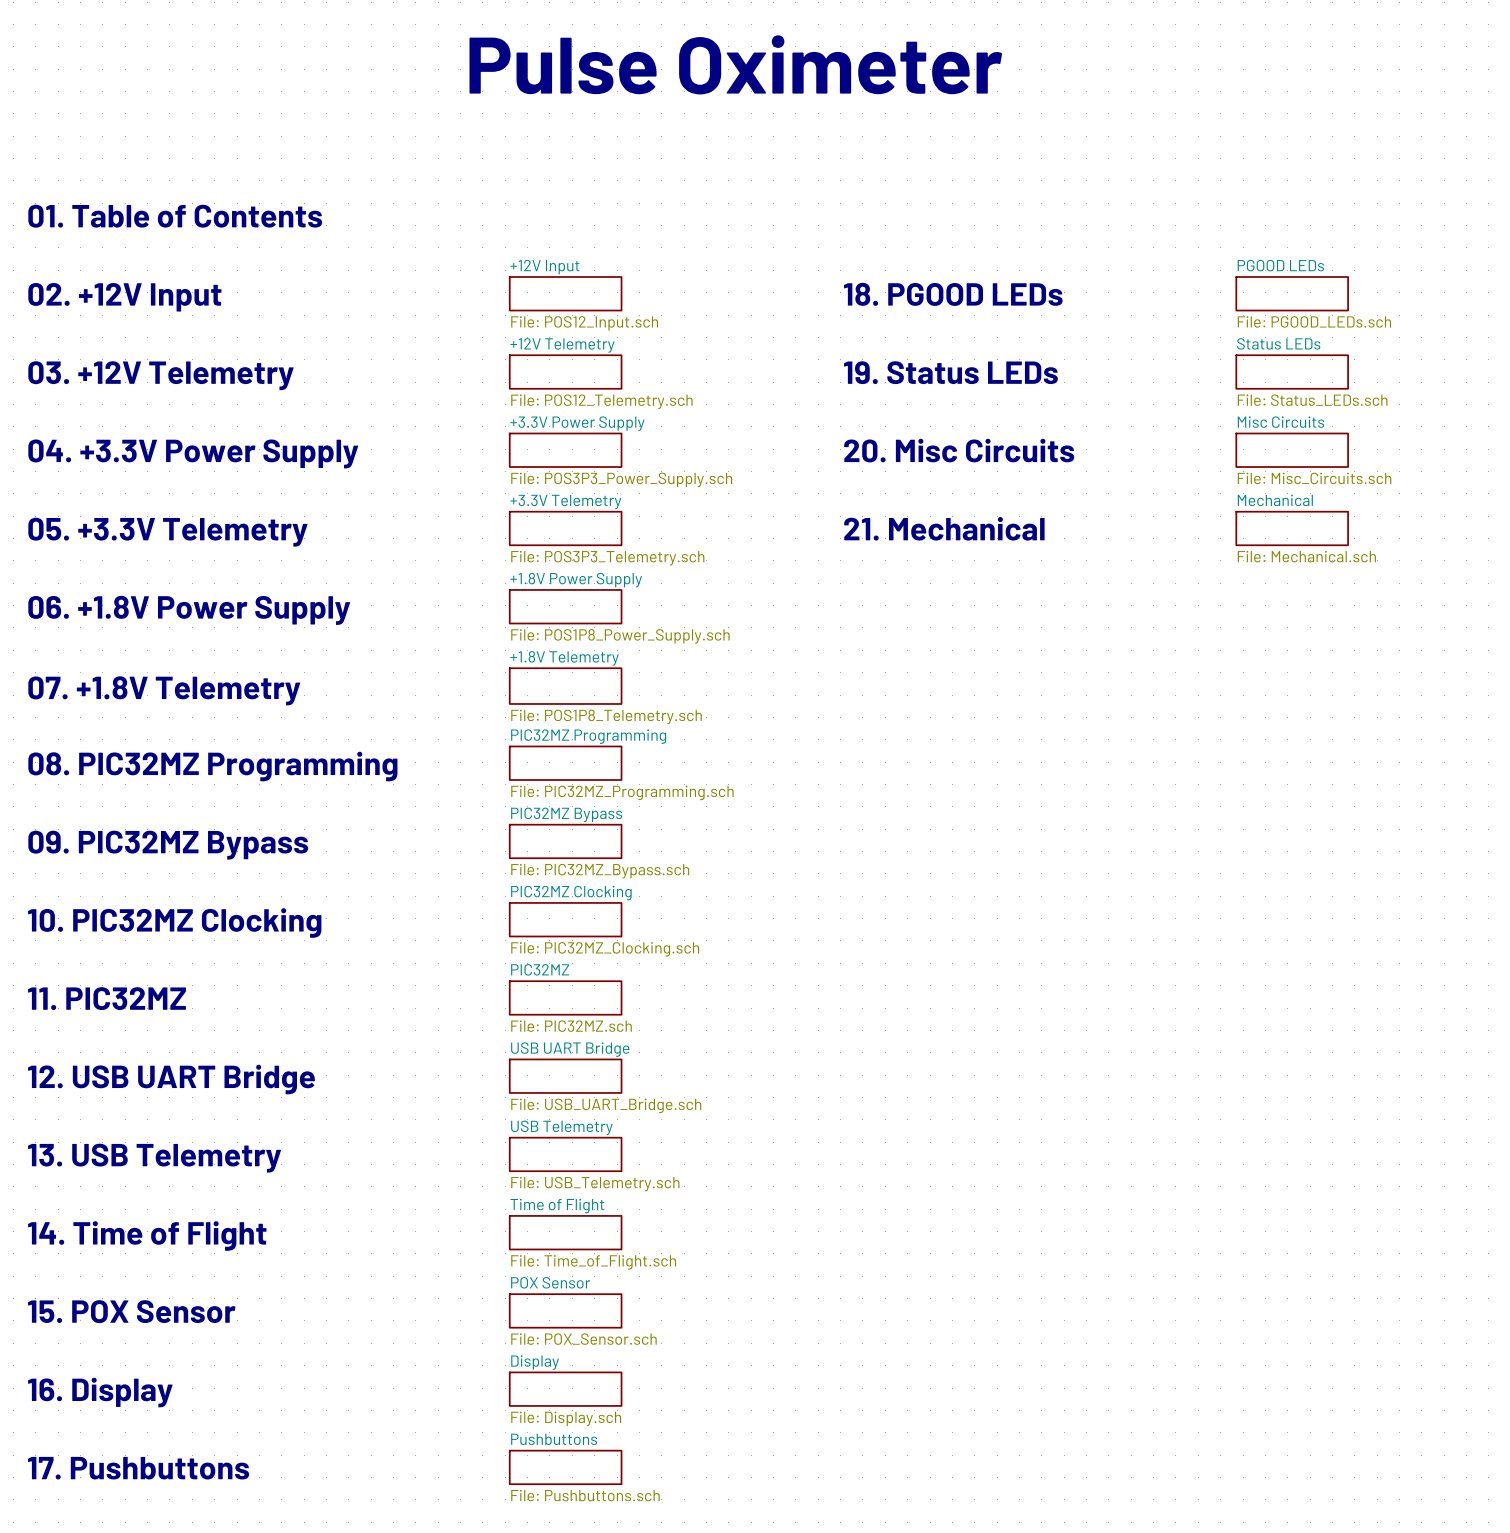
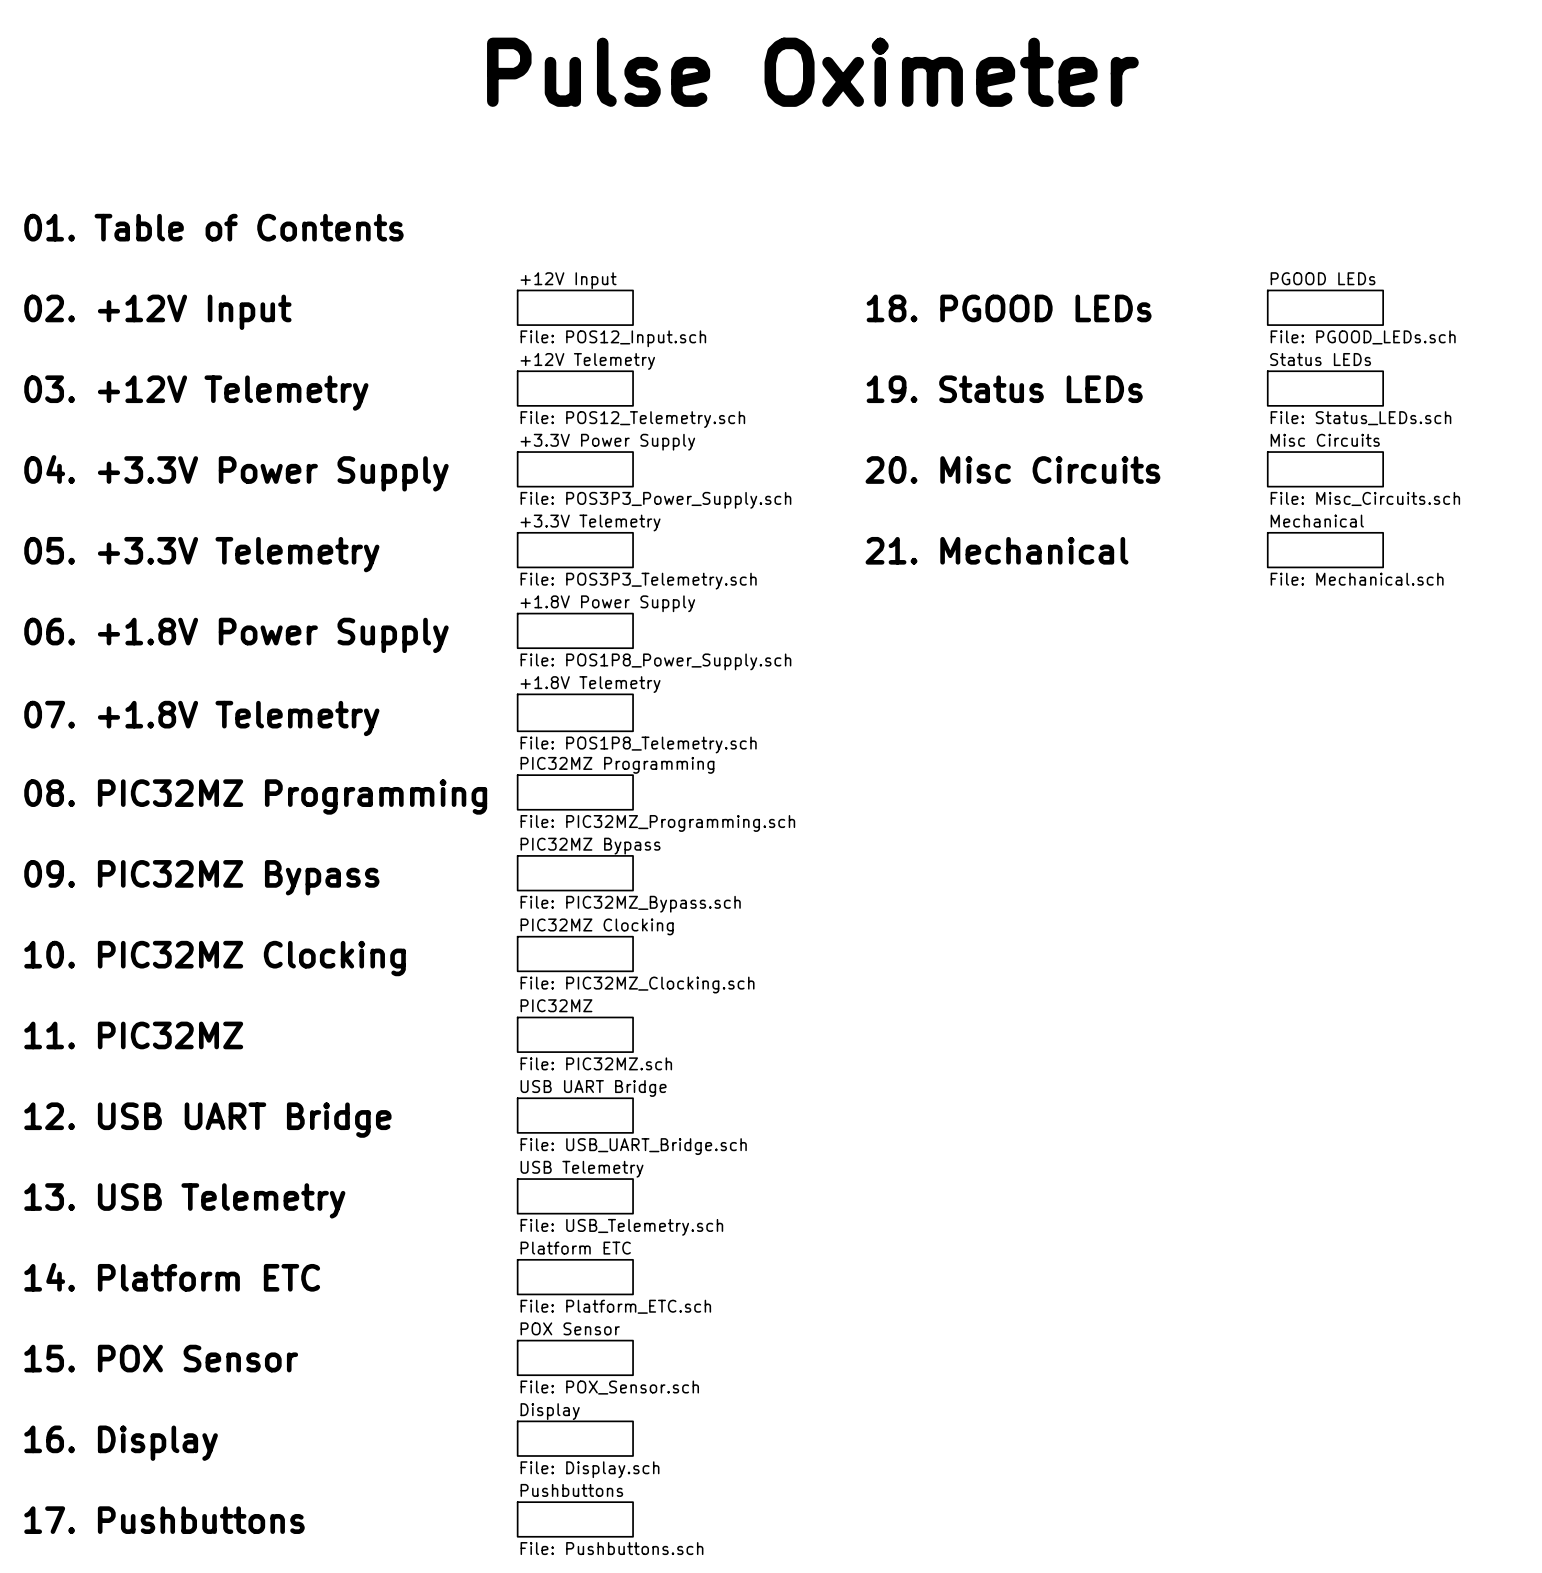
sheet Time of Flight name: Time of Flight (557, 1206) -> Platform ETC (575, 1248)
text: 14. Time of Flight (147, 1236) -> 14. Platform ETC (172, 1277)
sheet Time of Flight value: File: Time_of_Flight.sch (593, 1262) -> File: Platform_ETC.sch (615, 1306)

